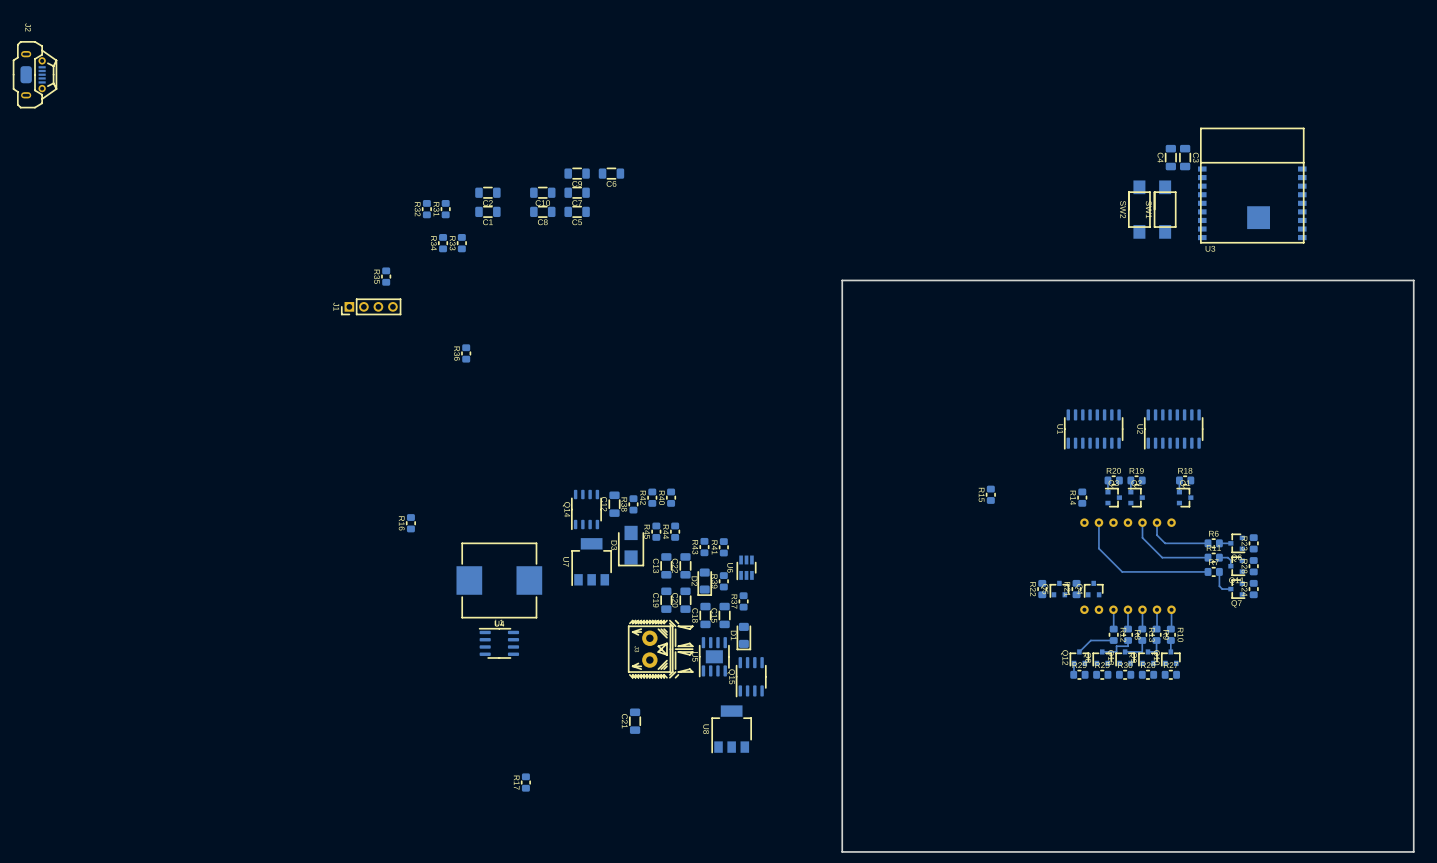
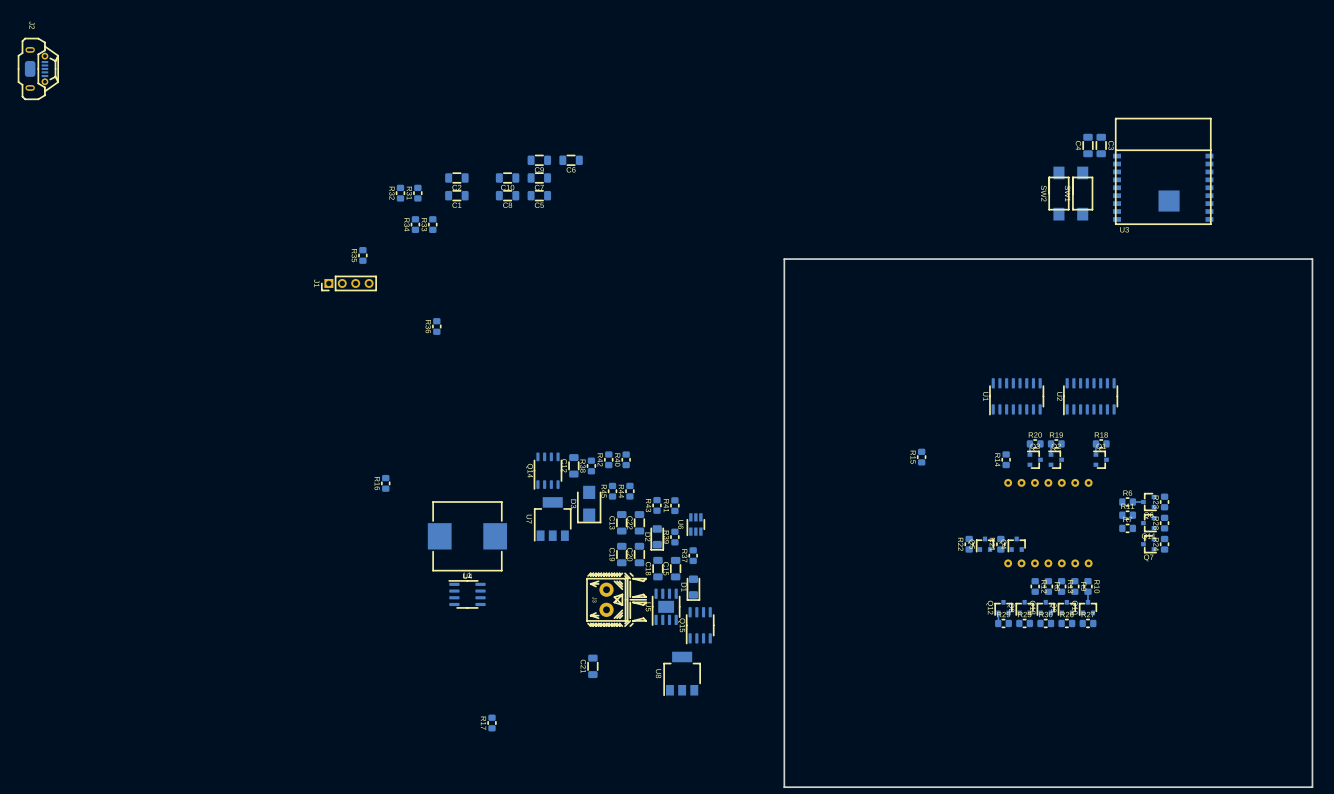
track: (1098, 522) (1098, 548) (1122, 571) (1207, 571) -> none
track: (1142, 522) (1142, 537) (1162, 557) (1207, 557) -> none
track: (1157, 522) (1157, 535) (1165, 543) (1207, 543) -> none
track: (1219, 557) (1227, 557) (1230, 560) (1230, 566) -> none
track: (1219, 571) (1219, 586) (1222, 589) (1230, 589) -> none
track: (1113, 609) (1113, 629) -> none
track: (1127, 609) (1127, 629) -> none
track: (1142, 609) (1142, 629) -> none
track: (1157, 609) (1156, 629) -> none
track: (1171, 609) (1170, 629) -> none
track: (1113, 640) (1090, 640) (1079, 651) -> none
track: (1127, 640) (1127, 646) (1116, 646) (1116, 651) (1102, 651) -> none
track: (1142, 640) (1142, 651) (1125, 651) -> none
track: (1156, 640) (1156, 651) (1147, 651) -> none

